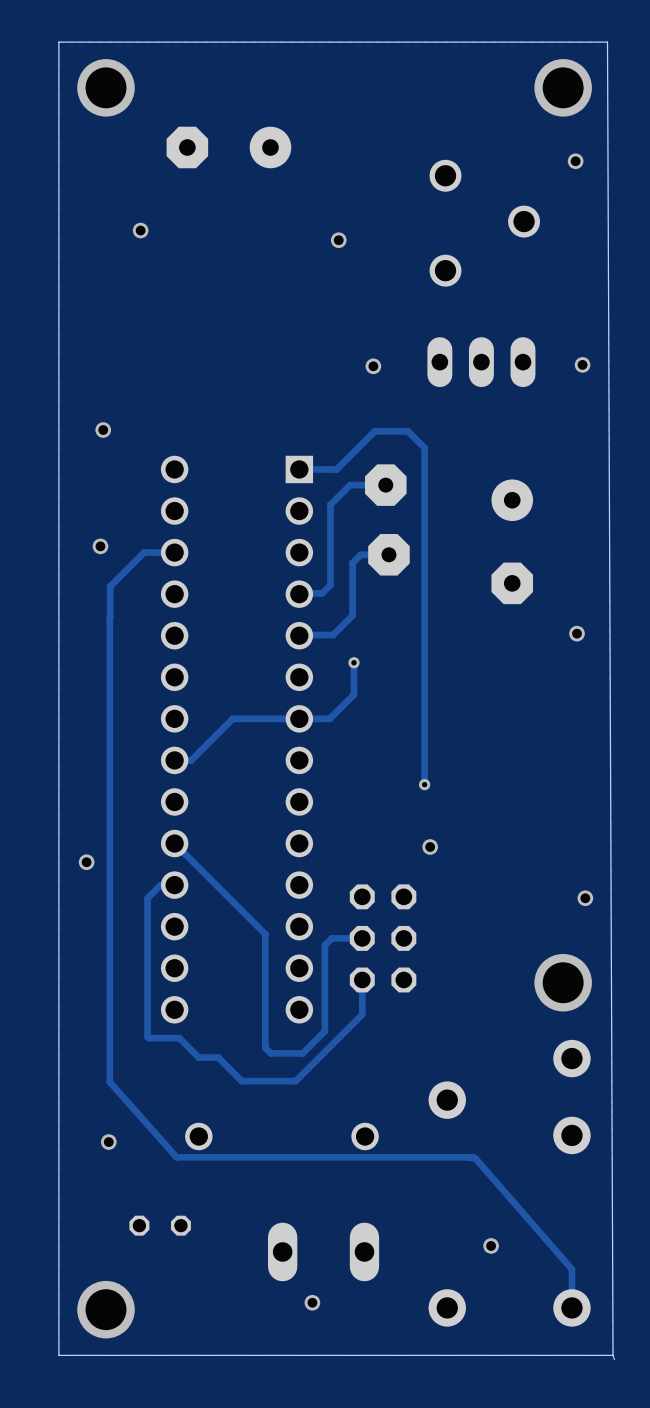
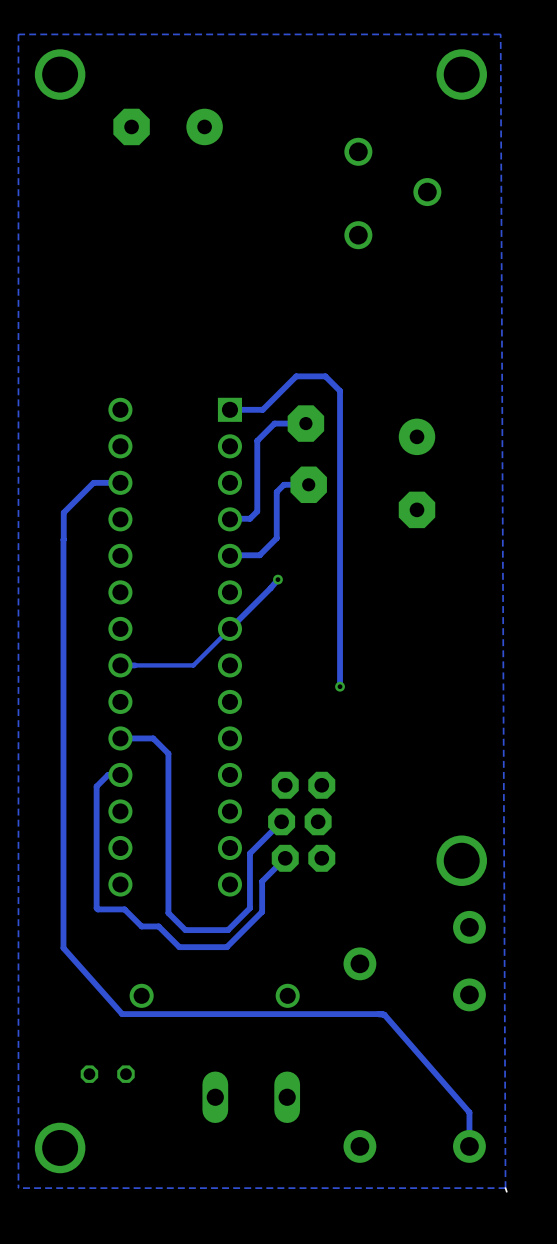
board edge: (607, 42) (58, 42) (58, 1355) (613, 1355) (607, 42) -> none
via: (575, 161) -> none
via: (140, 230) -> none
via: (338, 240) -> none
part: (481, 362) -> none
via: (582, 364) -> none
via: (373, 366) -> none
via: (103, 430) -> none
via: (100, 546) -> none
via: (577, 633) -> none
track: (353, 662) (353, 694) (329, 718) (232, 718) (191, 760) -> (277, 579) (193, 665) (134, 665)
track: (174, 843) (265, 934) (265, 1047) (270, 1053) (302, 1053) (324, 1031) (324, 945) (331, 938) (362, 938) -> (120, 738) (153, 738) (168, 753) (168, 913) (185, 930) (228, 930) (249, 908) (249, 853) (281, 821)
via: (430, 846) -> none
via: (86, 862) -> none
part footprint: [349, 884, 417, 993] -> [268, 771, 336, 872]
via: (585, 898) -> none
track: (362, 979) (362, 1014) (335, 1040) -> (285, 858) (262, 881) (262, 911)
via: (108, 1142) -> none
via: (491, 1245) -> none
via: (312, 1302) -> none

